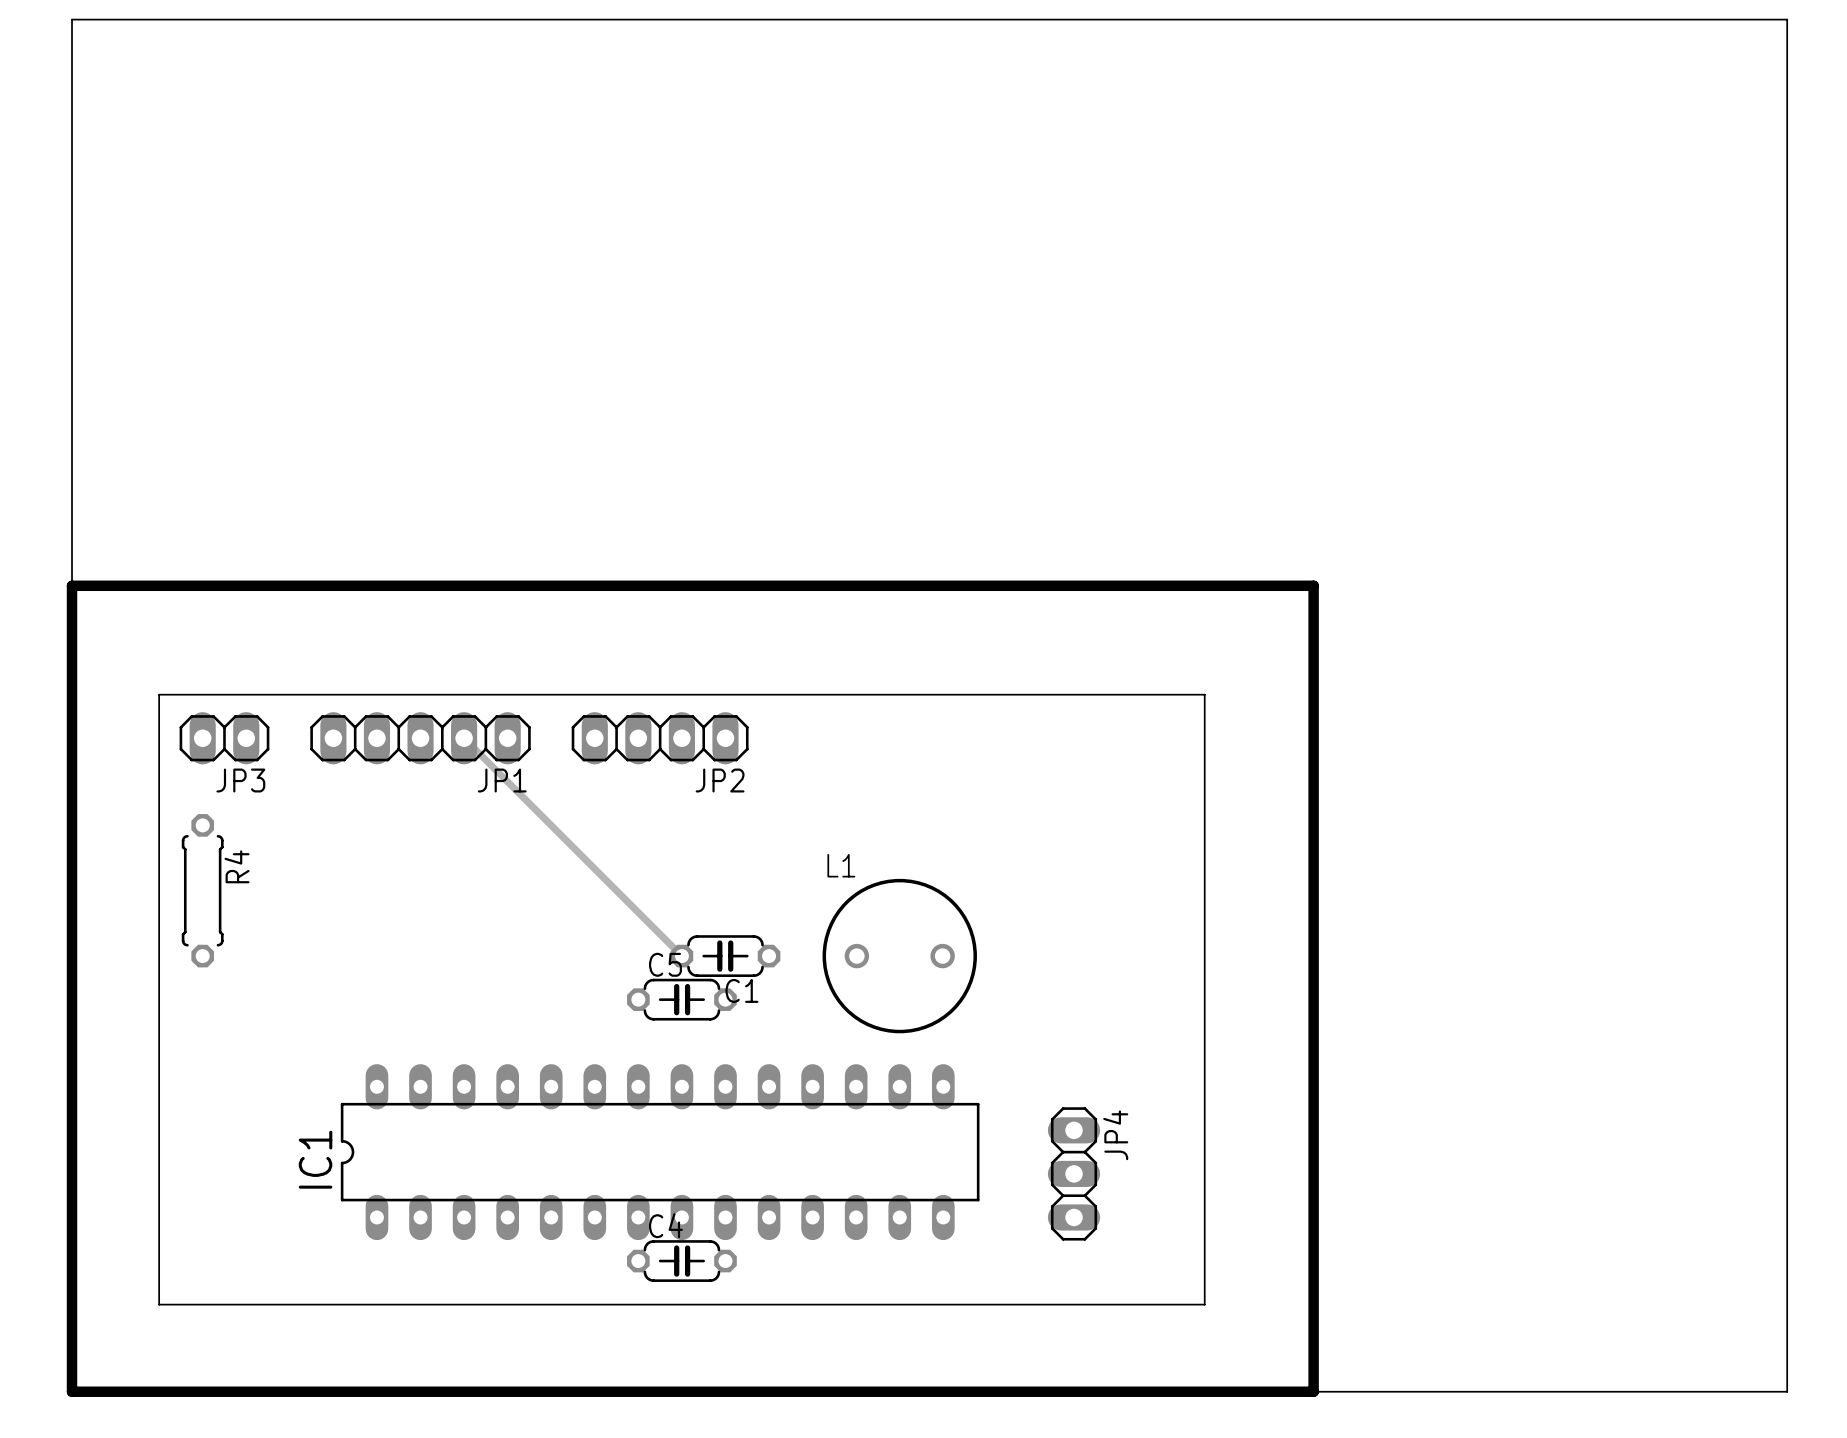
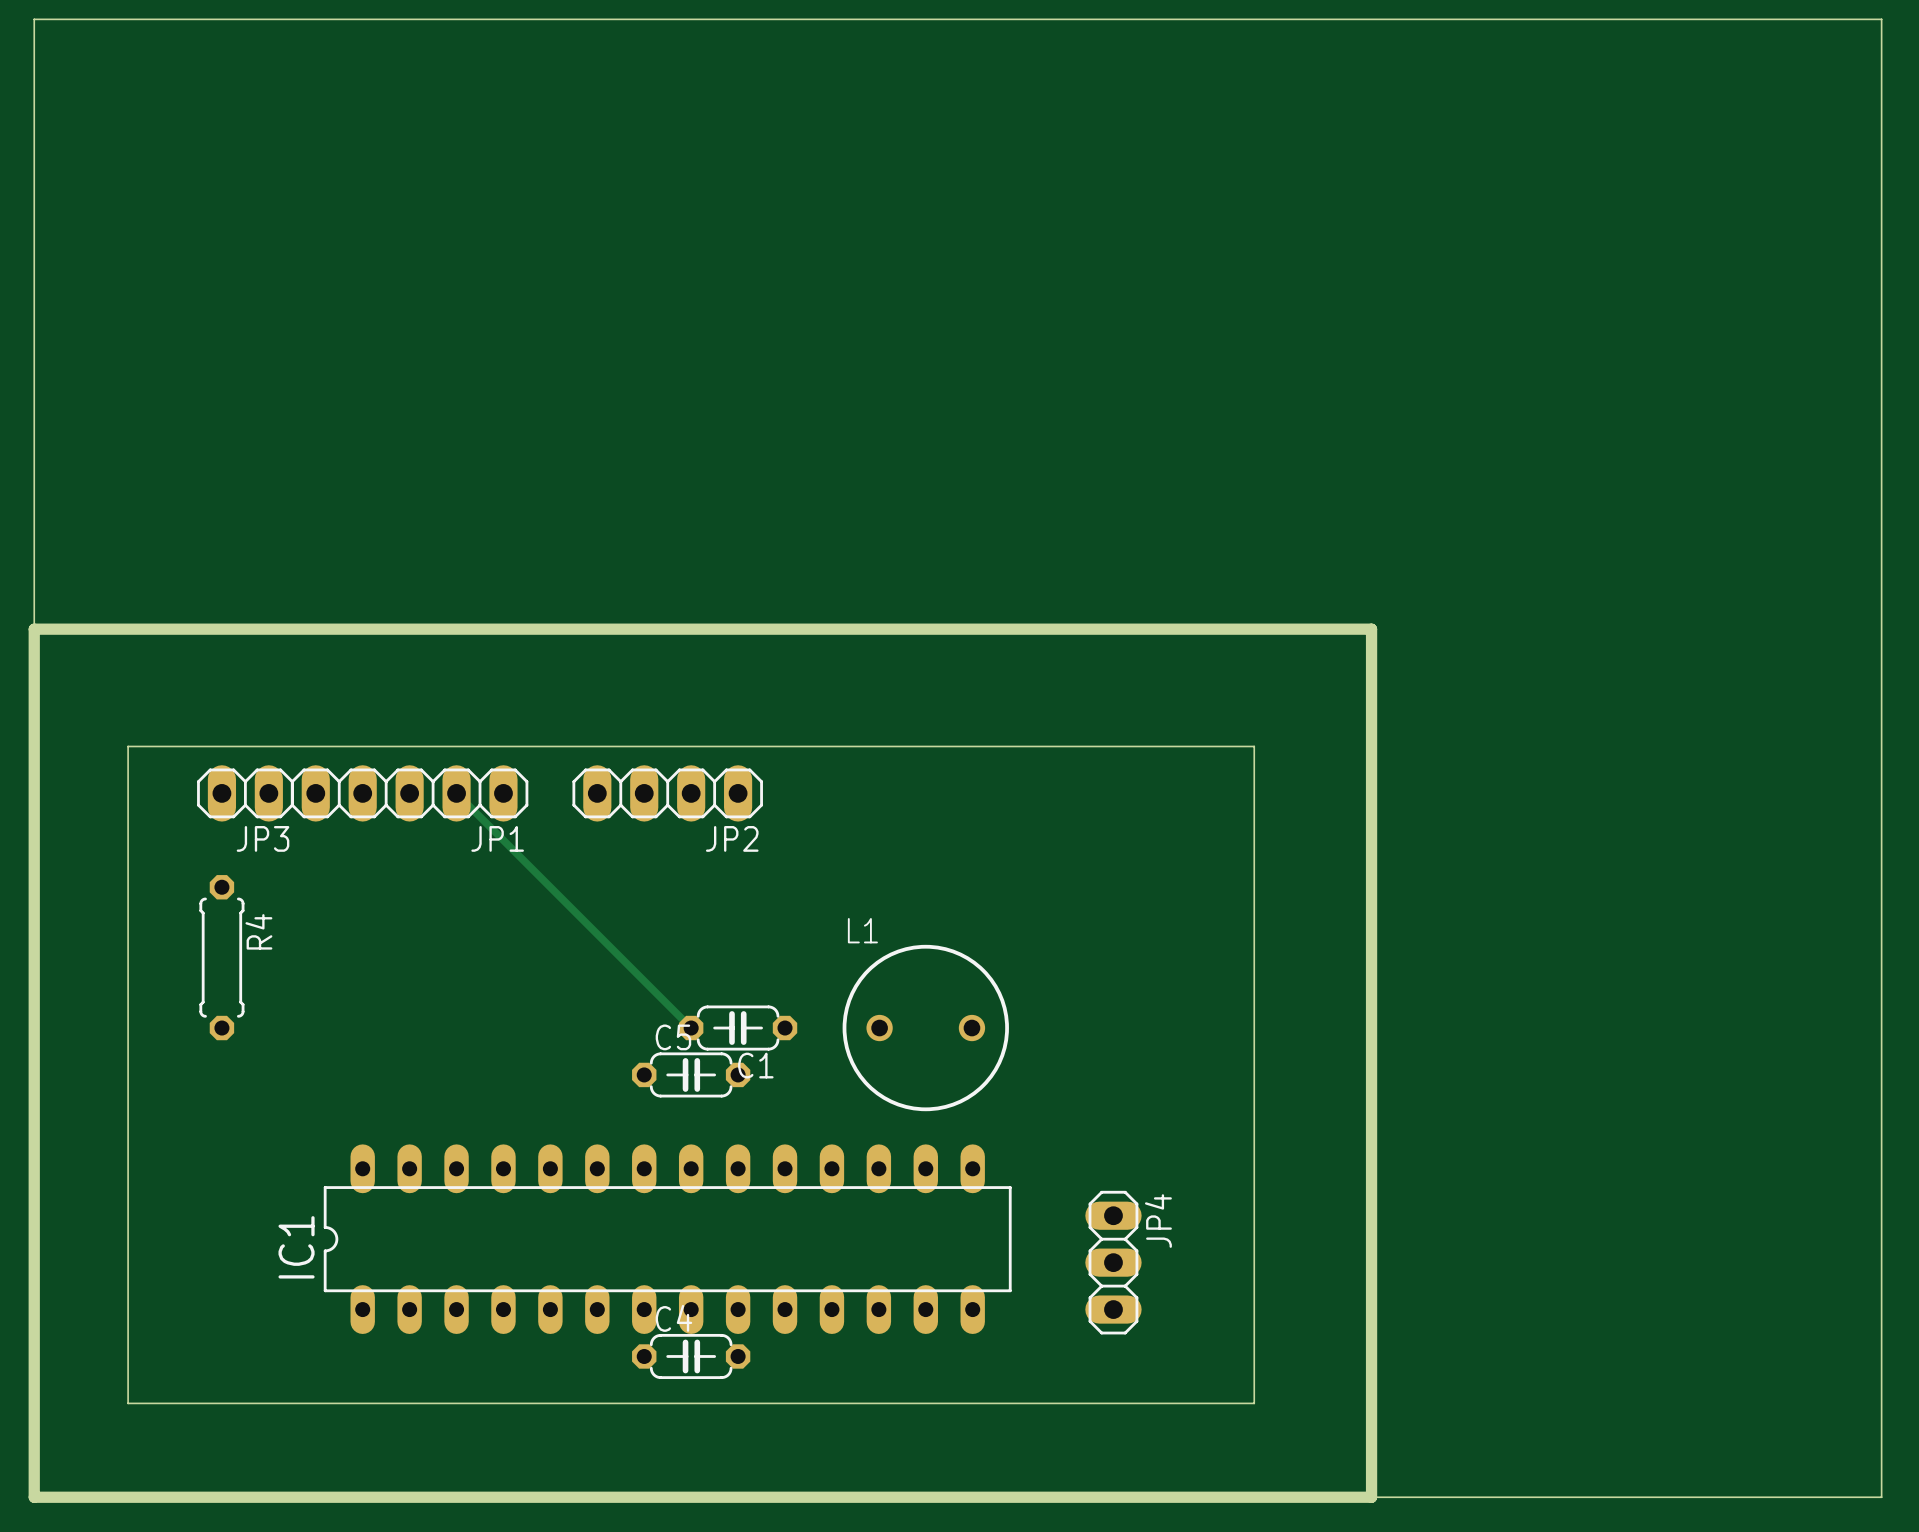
JP3 position: (224, 738) -> (245, 793)
R4 position: (202, 890) -> (221, 957)

